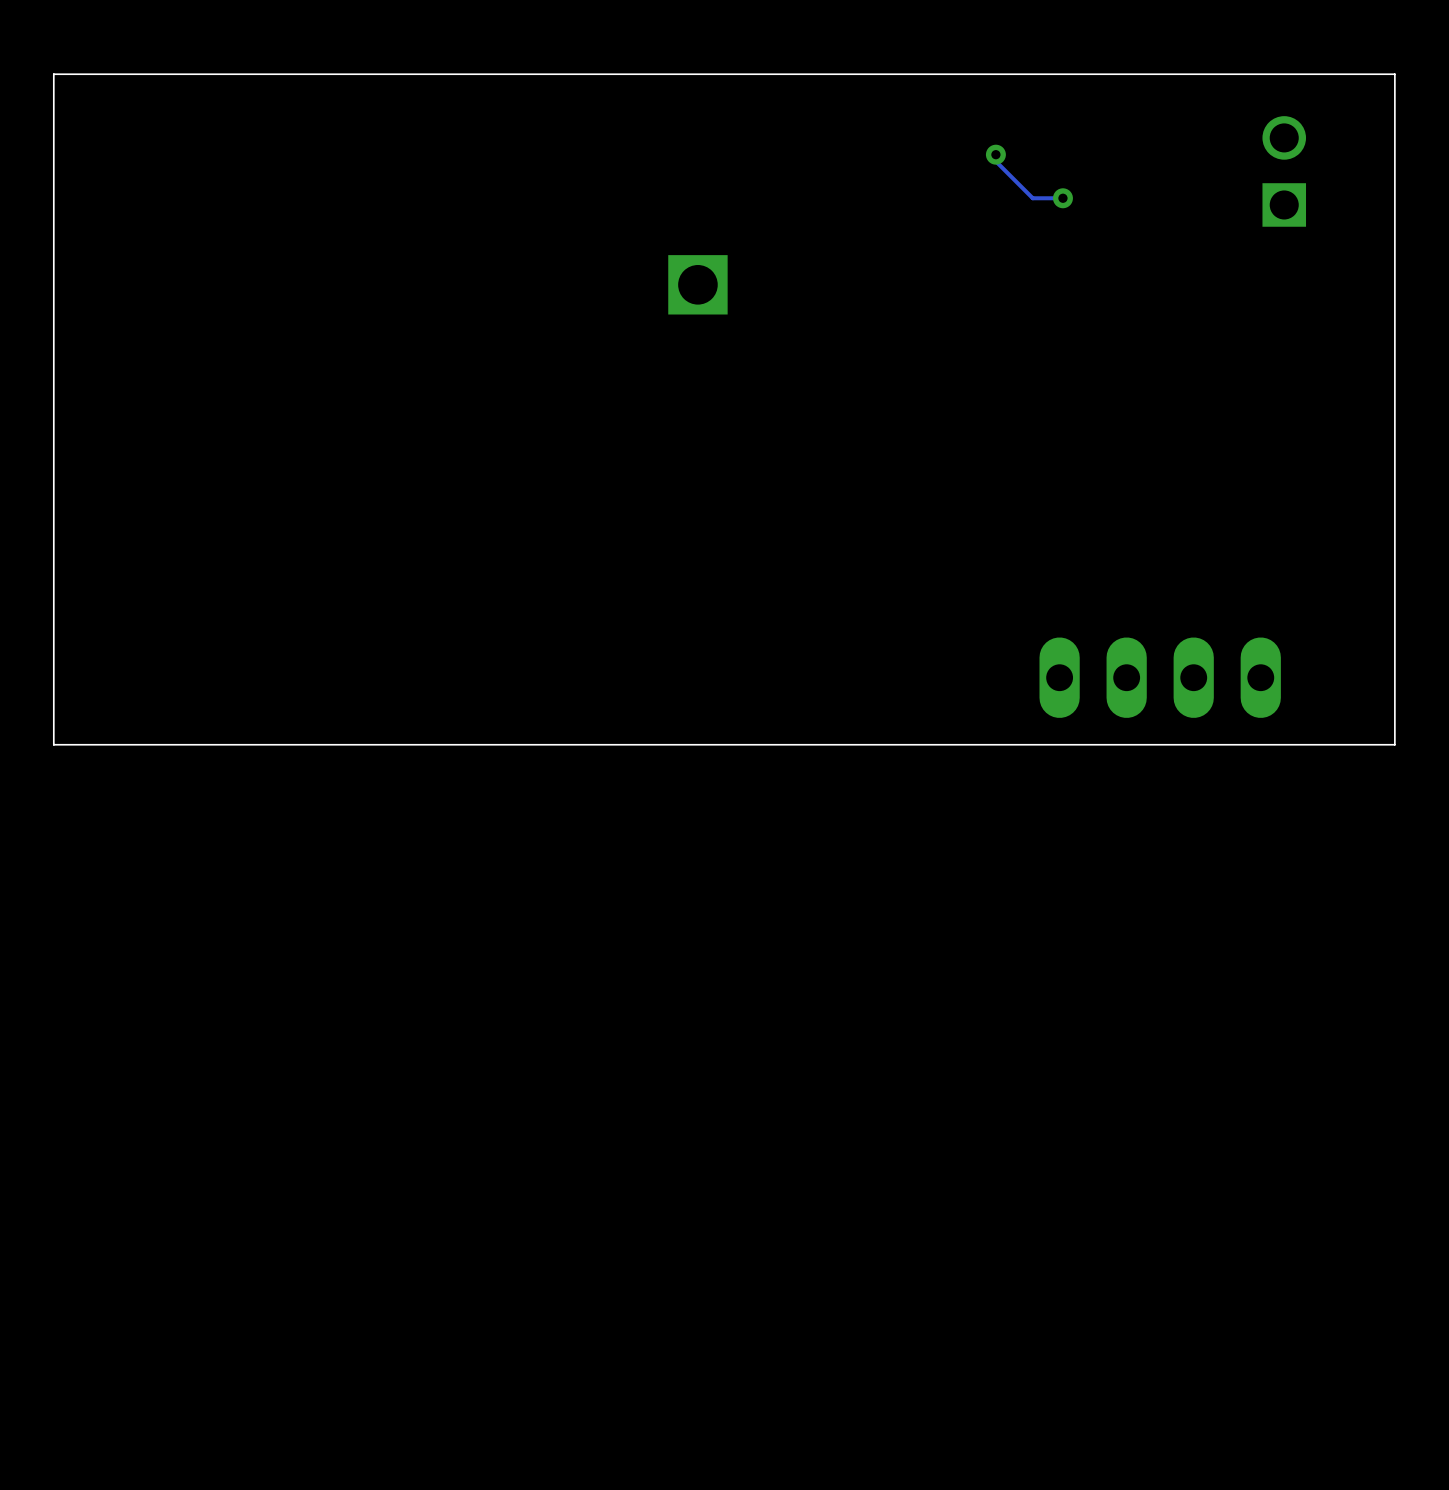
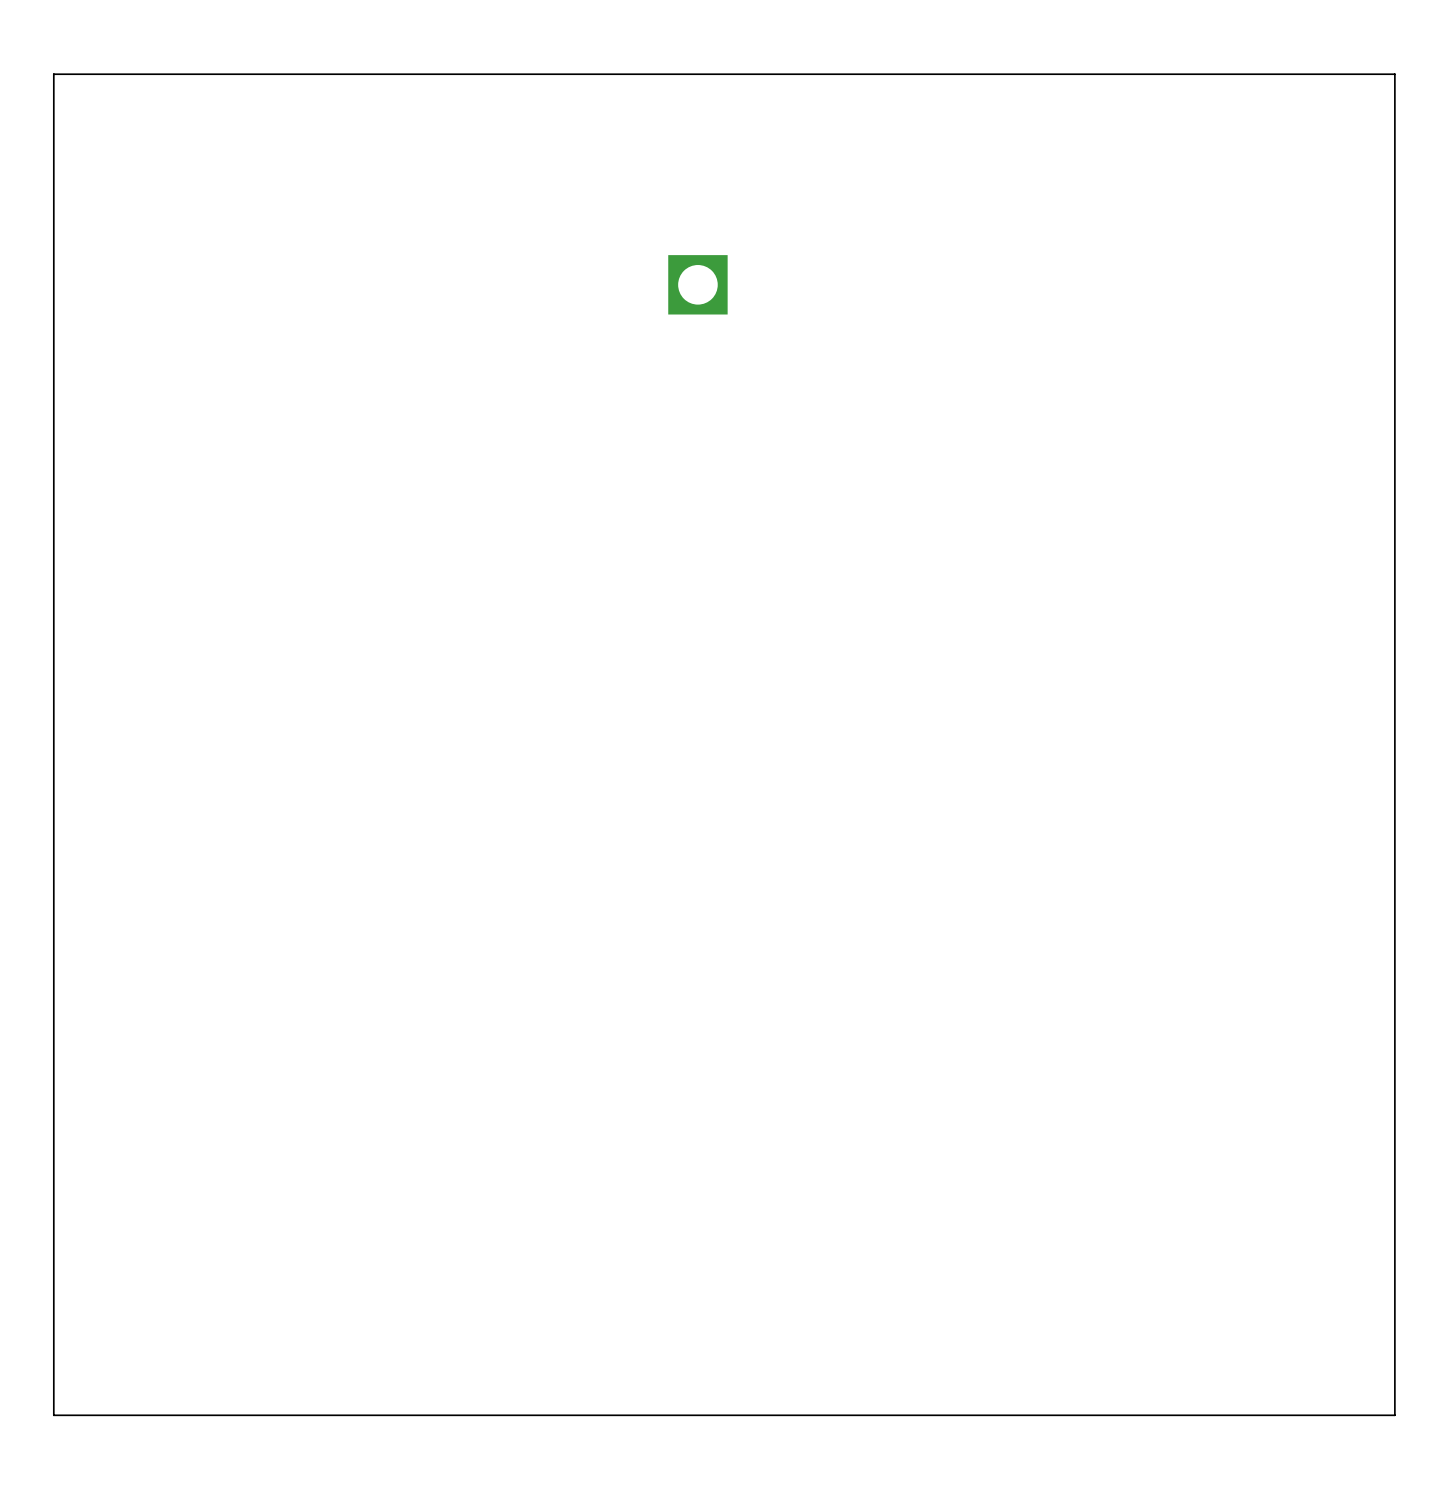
track: (995, 154) (995, 161) (1032, 198) (1062, 198) -> none
via: (995, 154) -> none
part: (1284, 171) -> none
via: (1062, 198) -> none
part: (1160, 677) -> none
board edge: (1394, 744) (53, 744) -> (1394, 744) (1394, 1415) (53, 1415) (53, 744)

